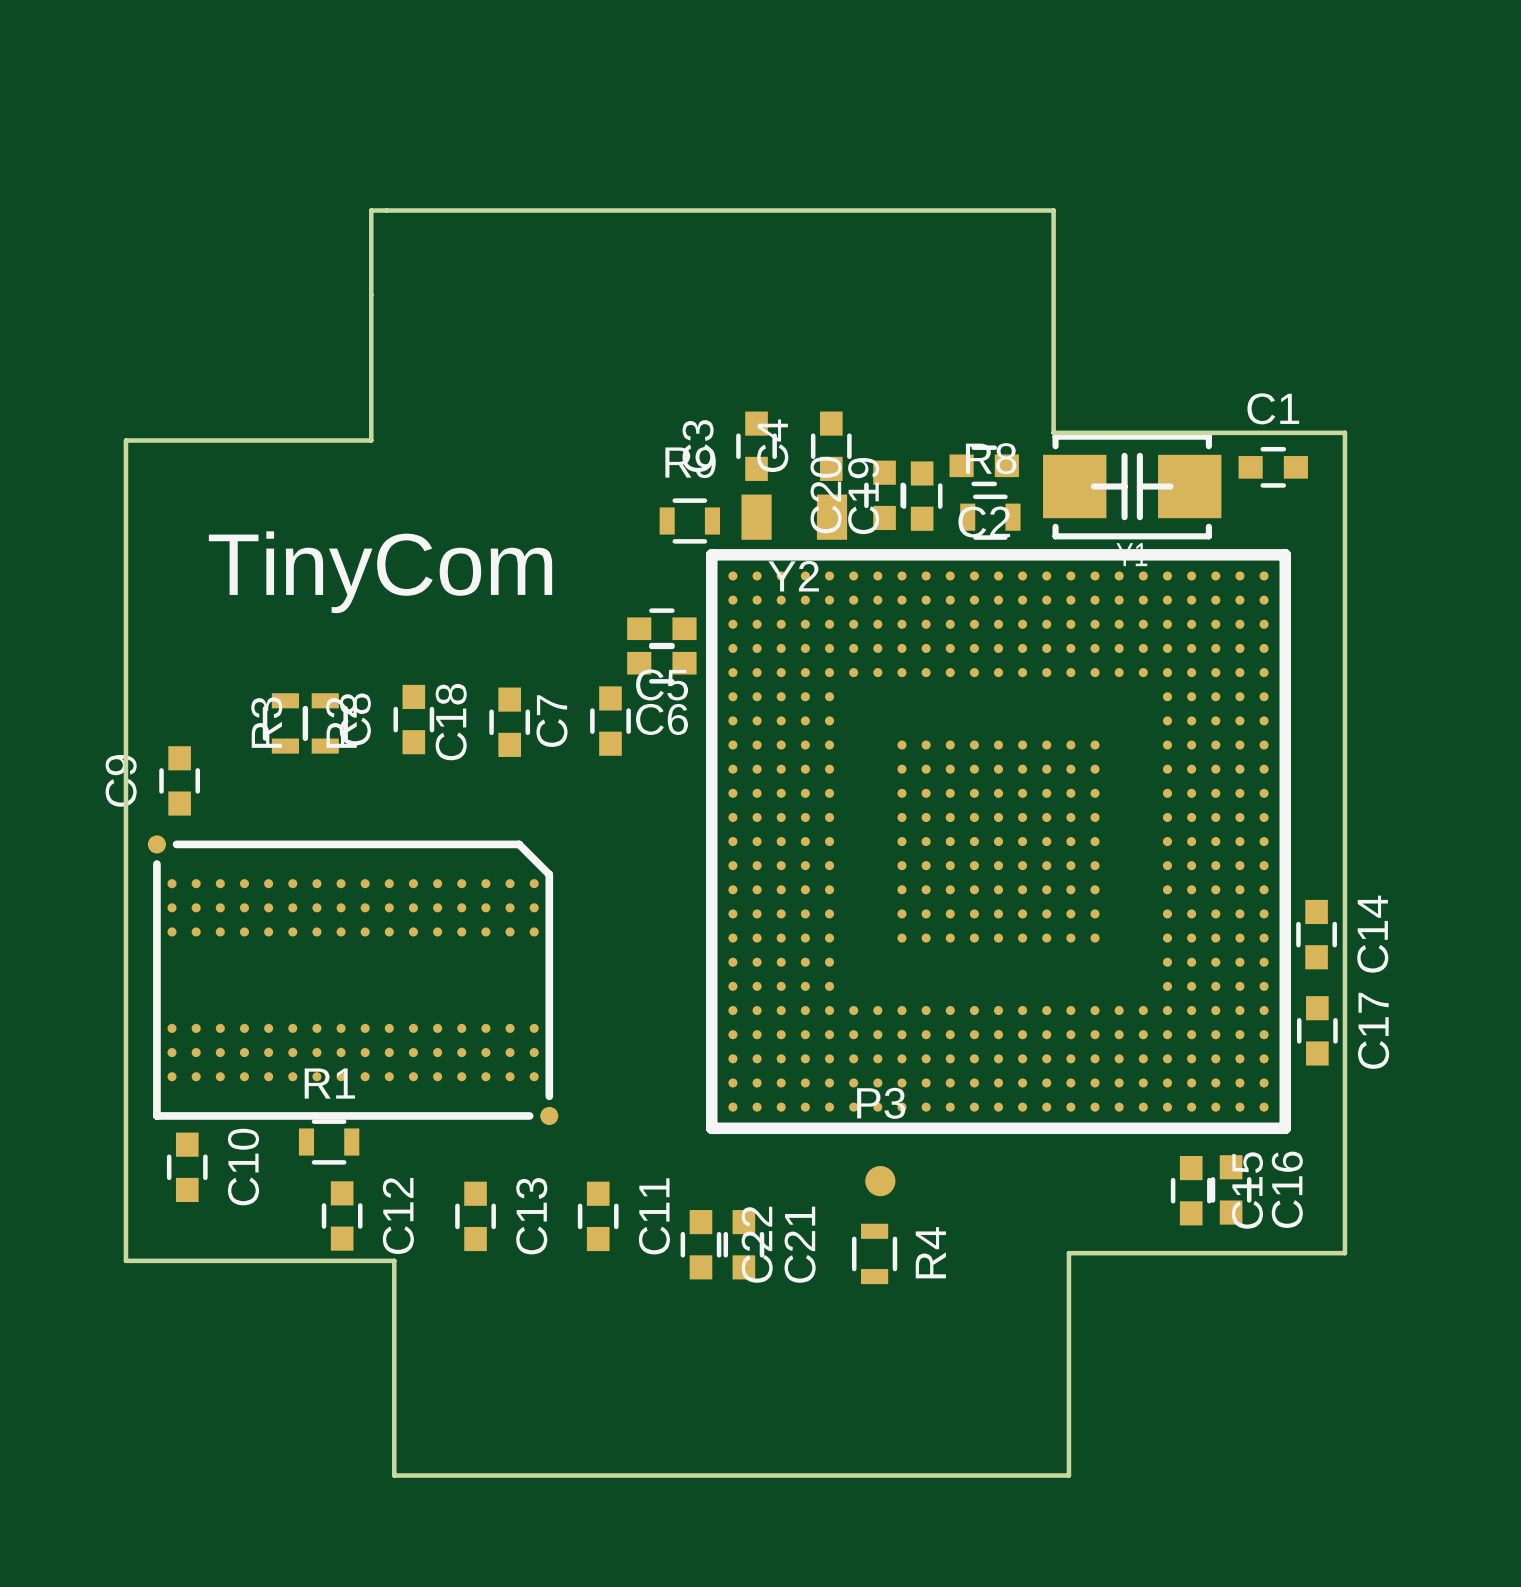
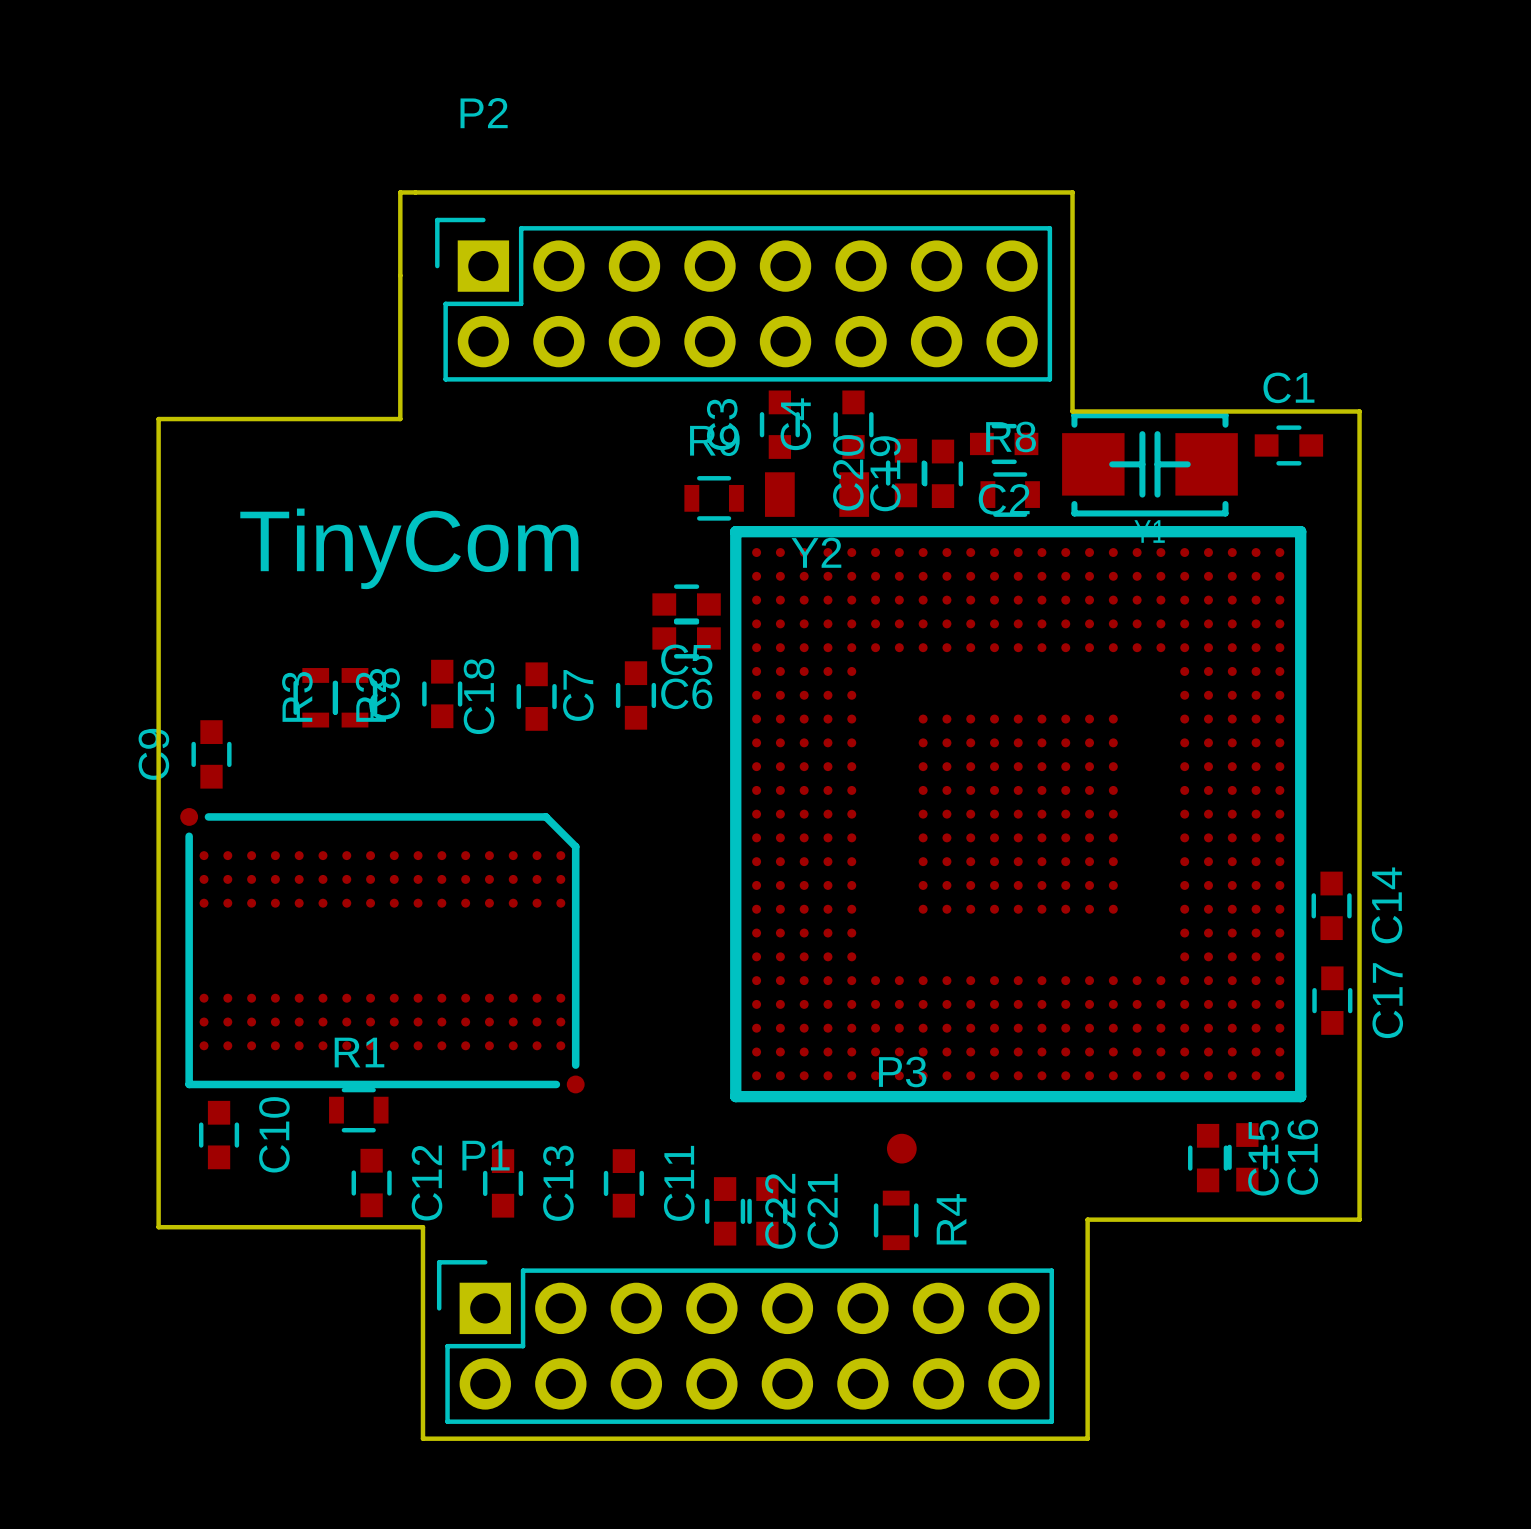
P2: none -> (743, 299)
P1: none -> (745, 1341)

